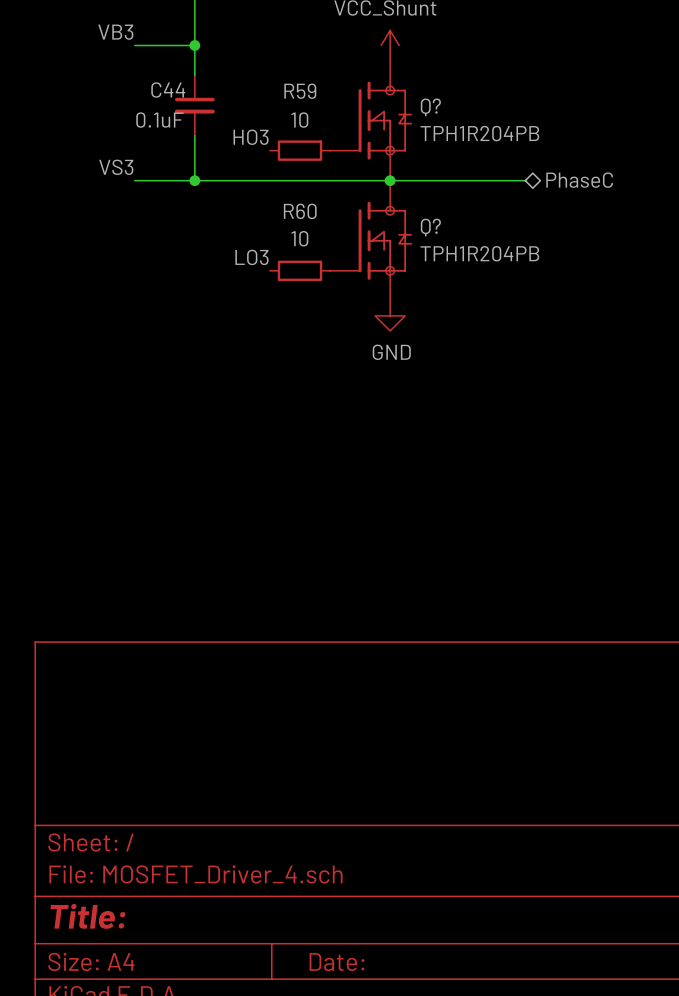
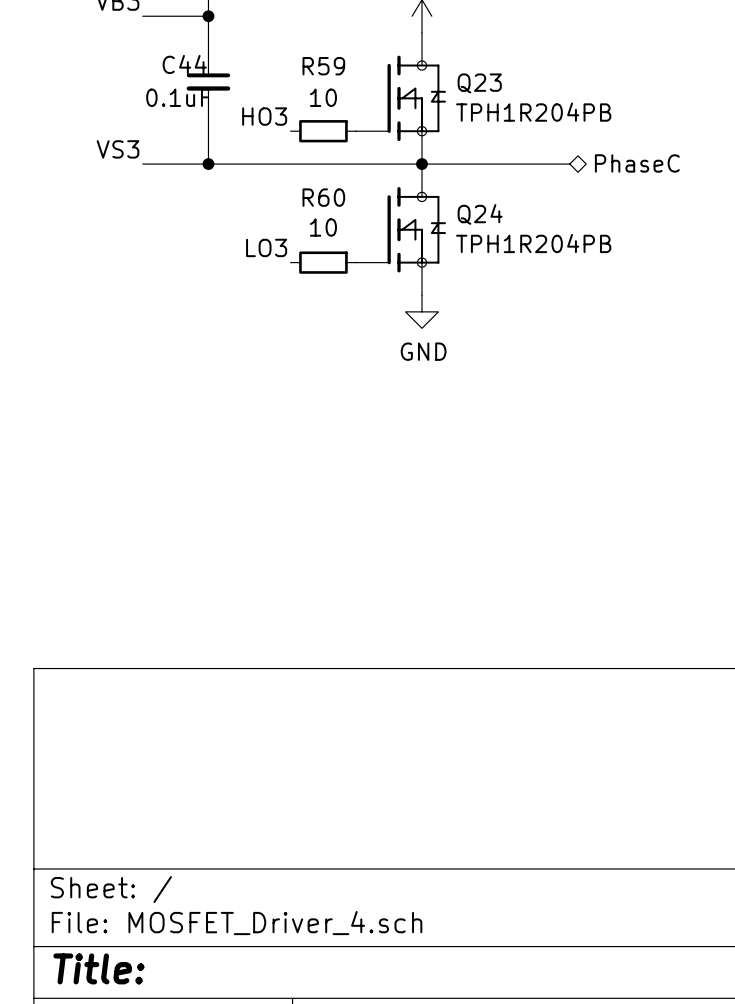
Q? name: Q? (430, 107) -> Q23 (479, 83)
Q? name: Q? (430, 227) -> Q24 (480, 214)

